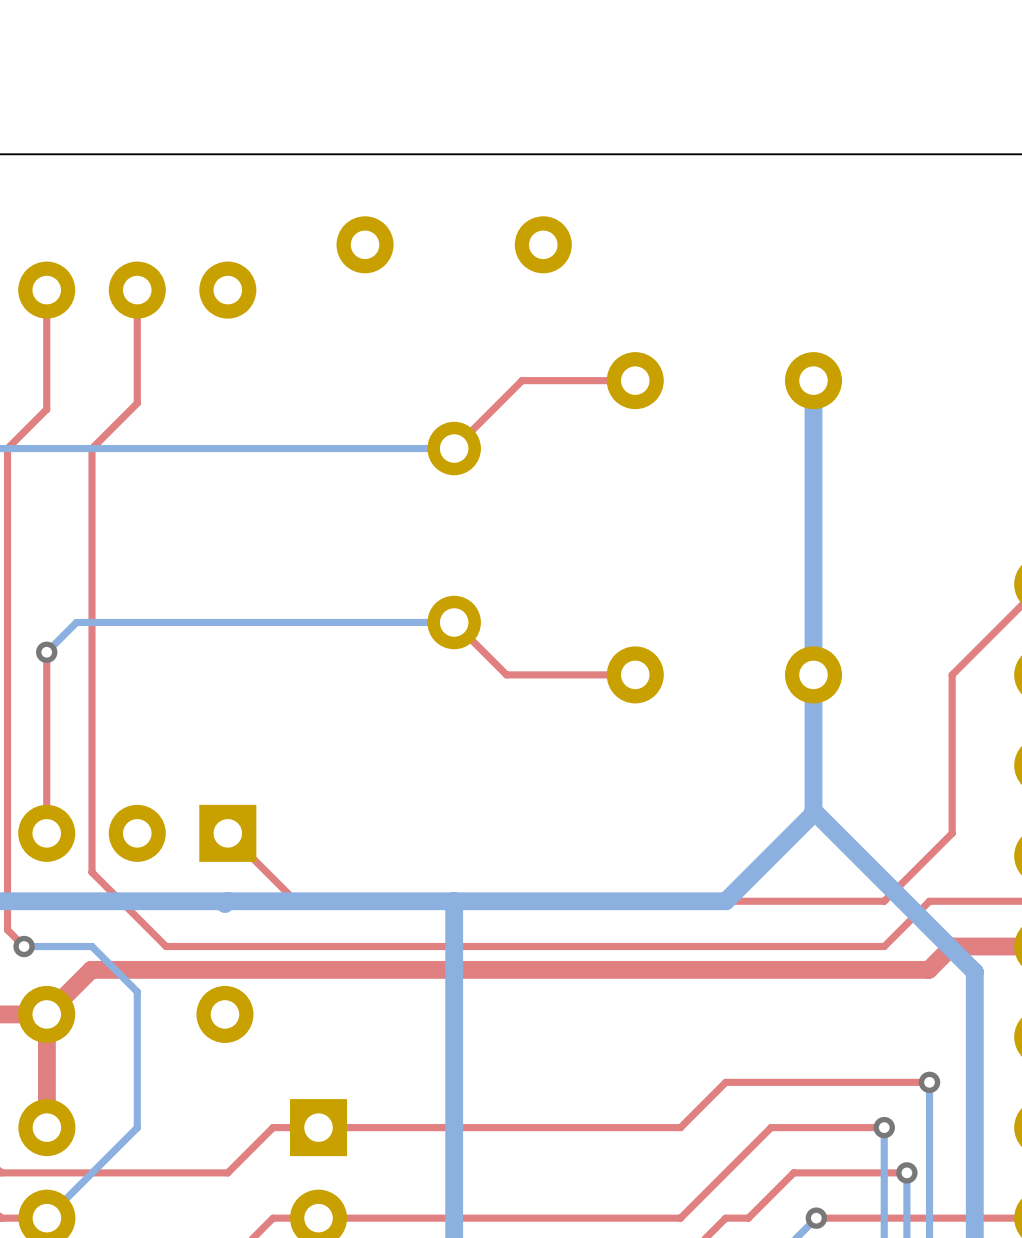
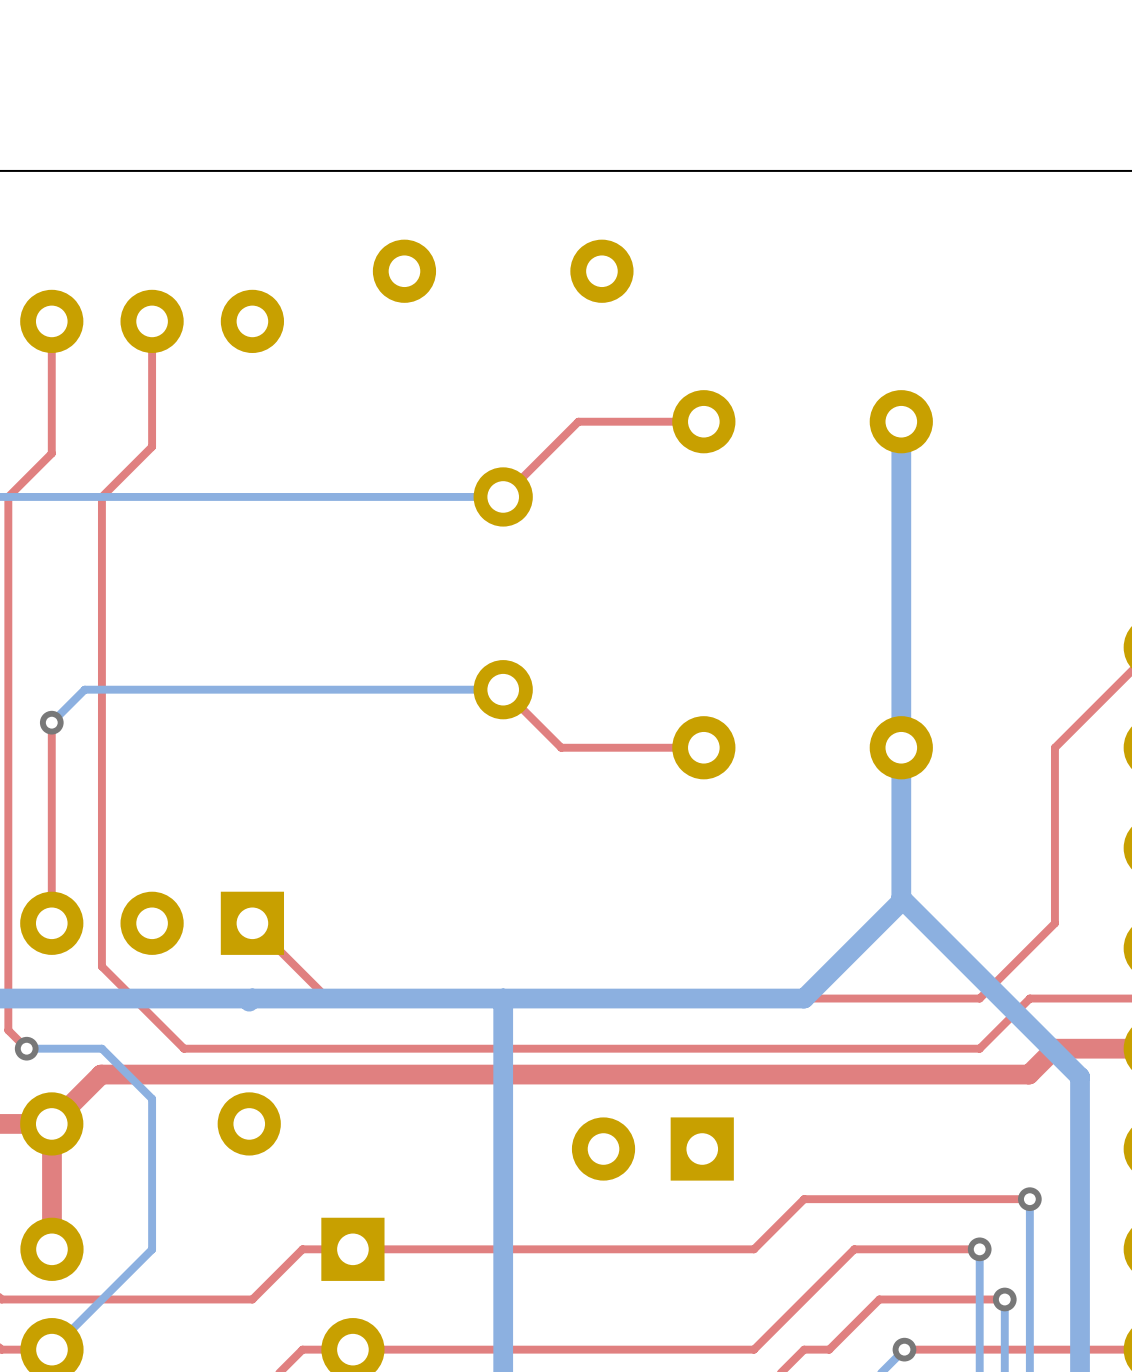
part: none -> (652, 1149)

